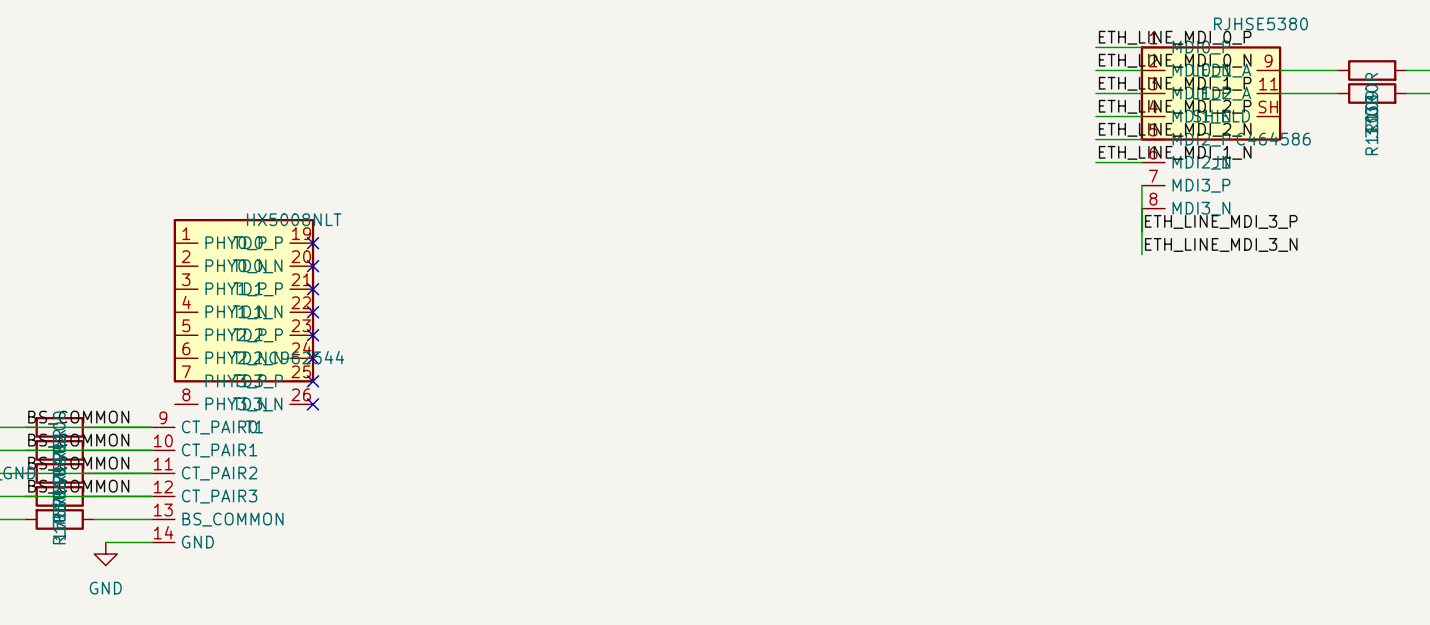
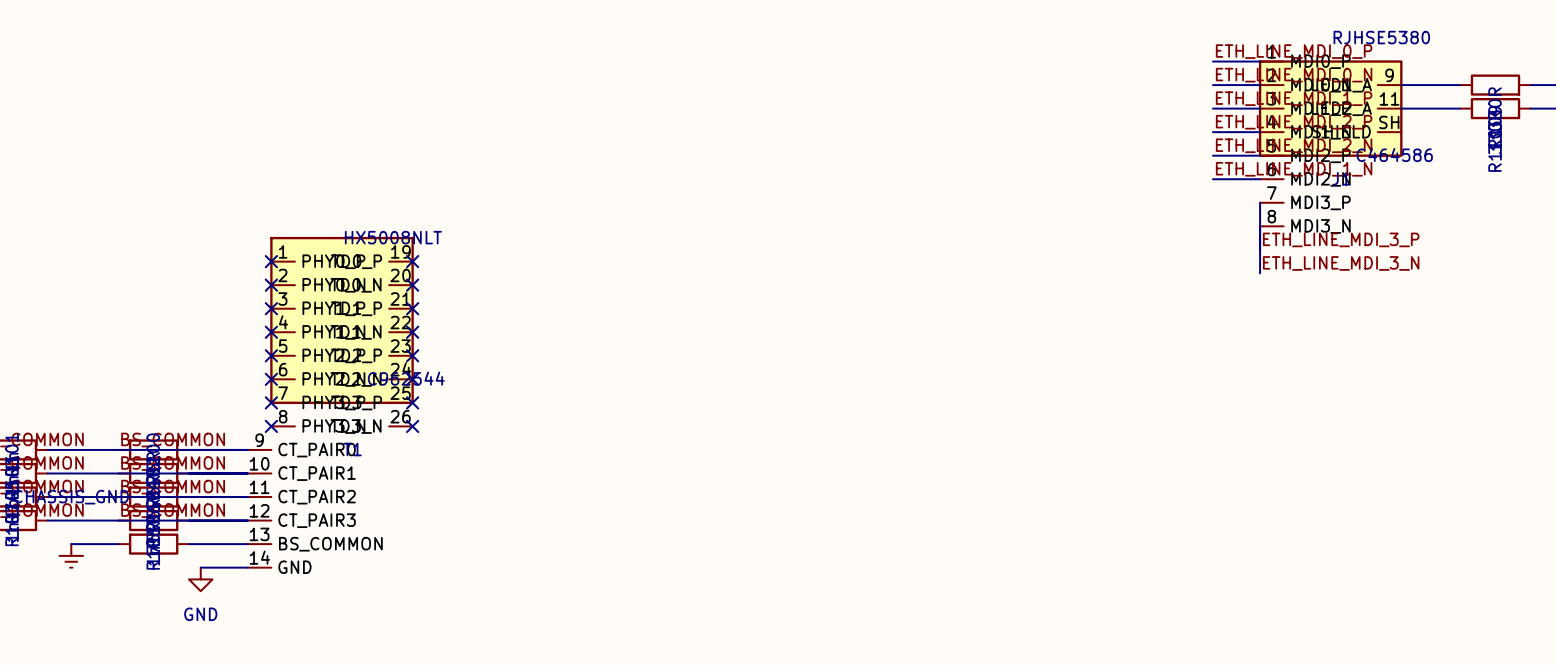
no-connect mark: none -> (271, 261)
no-connect mark: none -> (271, 285)
no-connect mark: none -> (271, 308)
no-connect mark: none -> (271, 332)
no-connect mark: none -> (271, 355)
no-connect mark: none -> (271, 379)
no-connect mark: none -> (271, 402)
no-connect mark: none -> (271, 426)

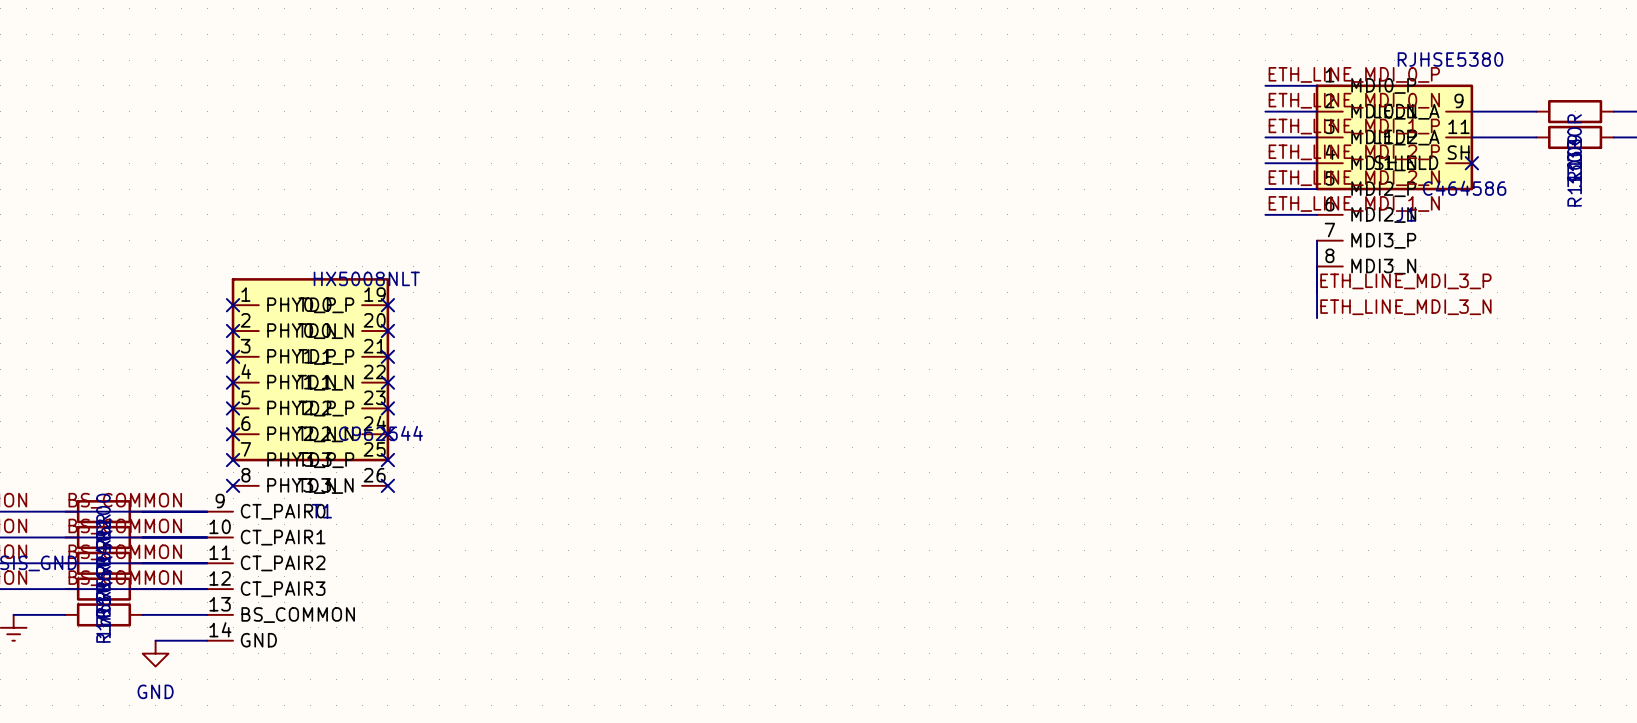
no-connect mark: none -> (1471, 163)

